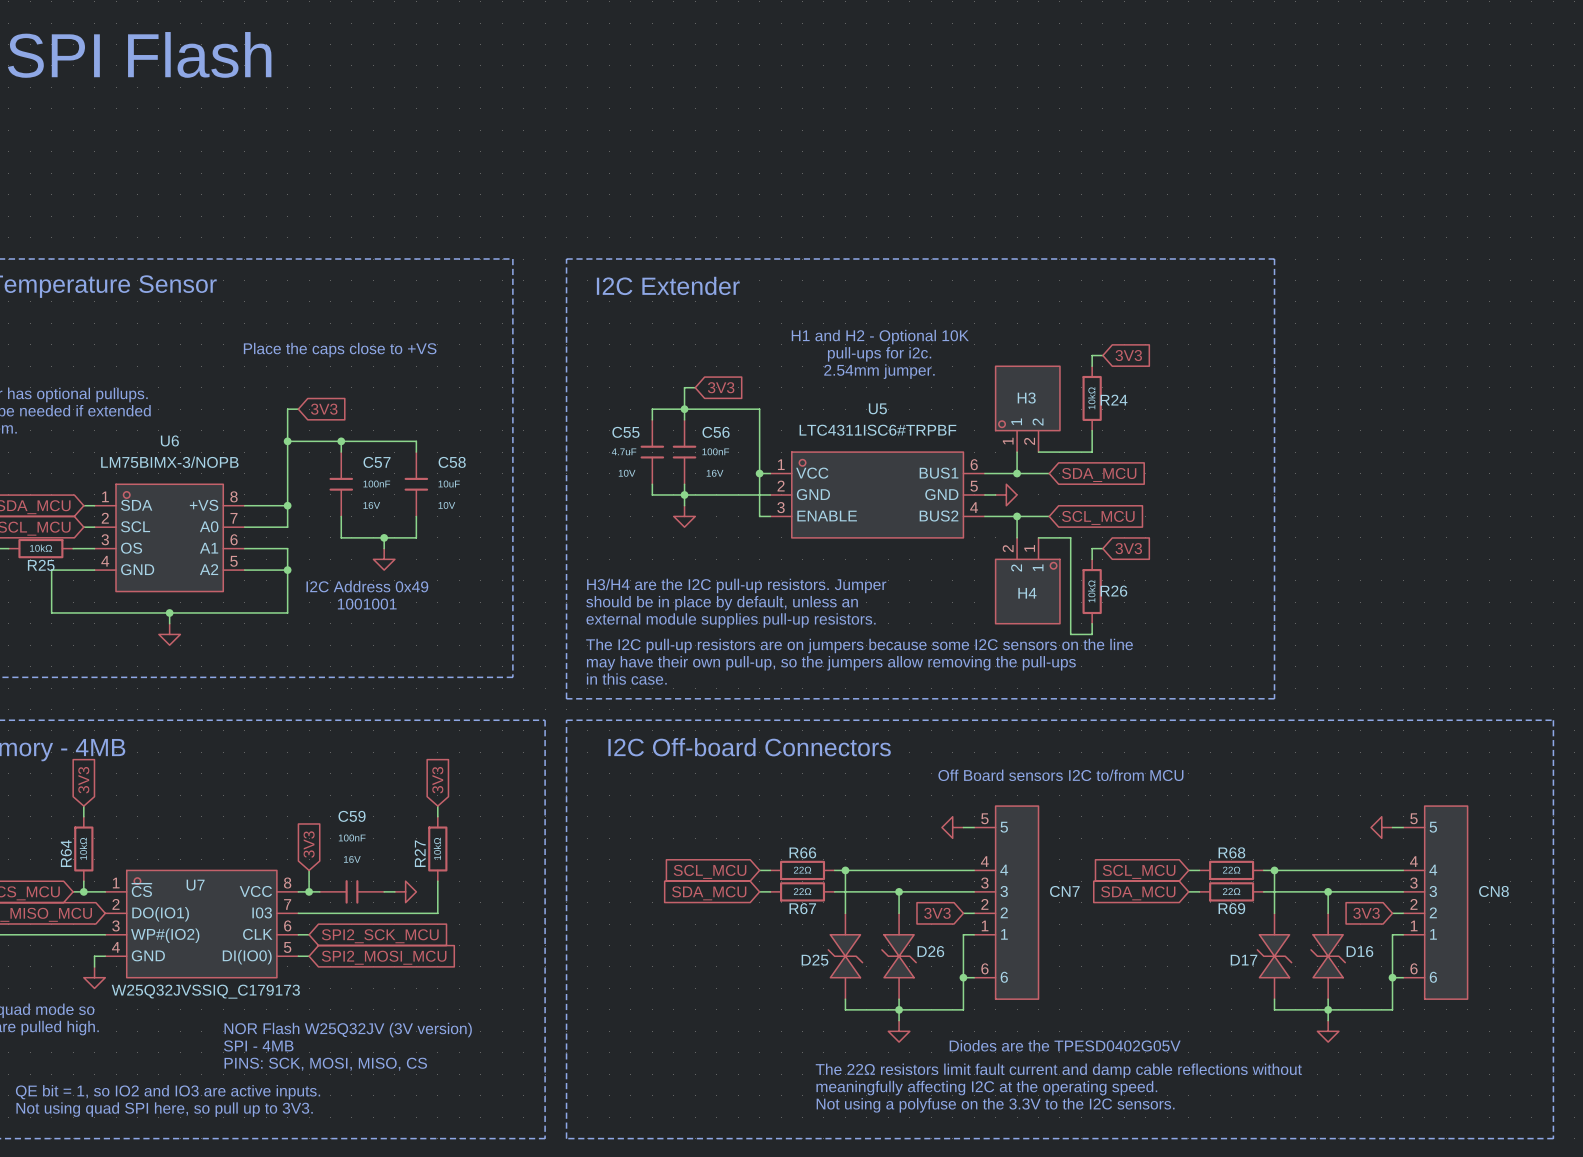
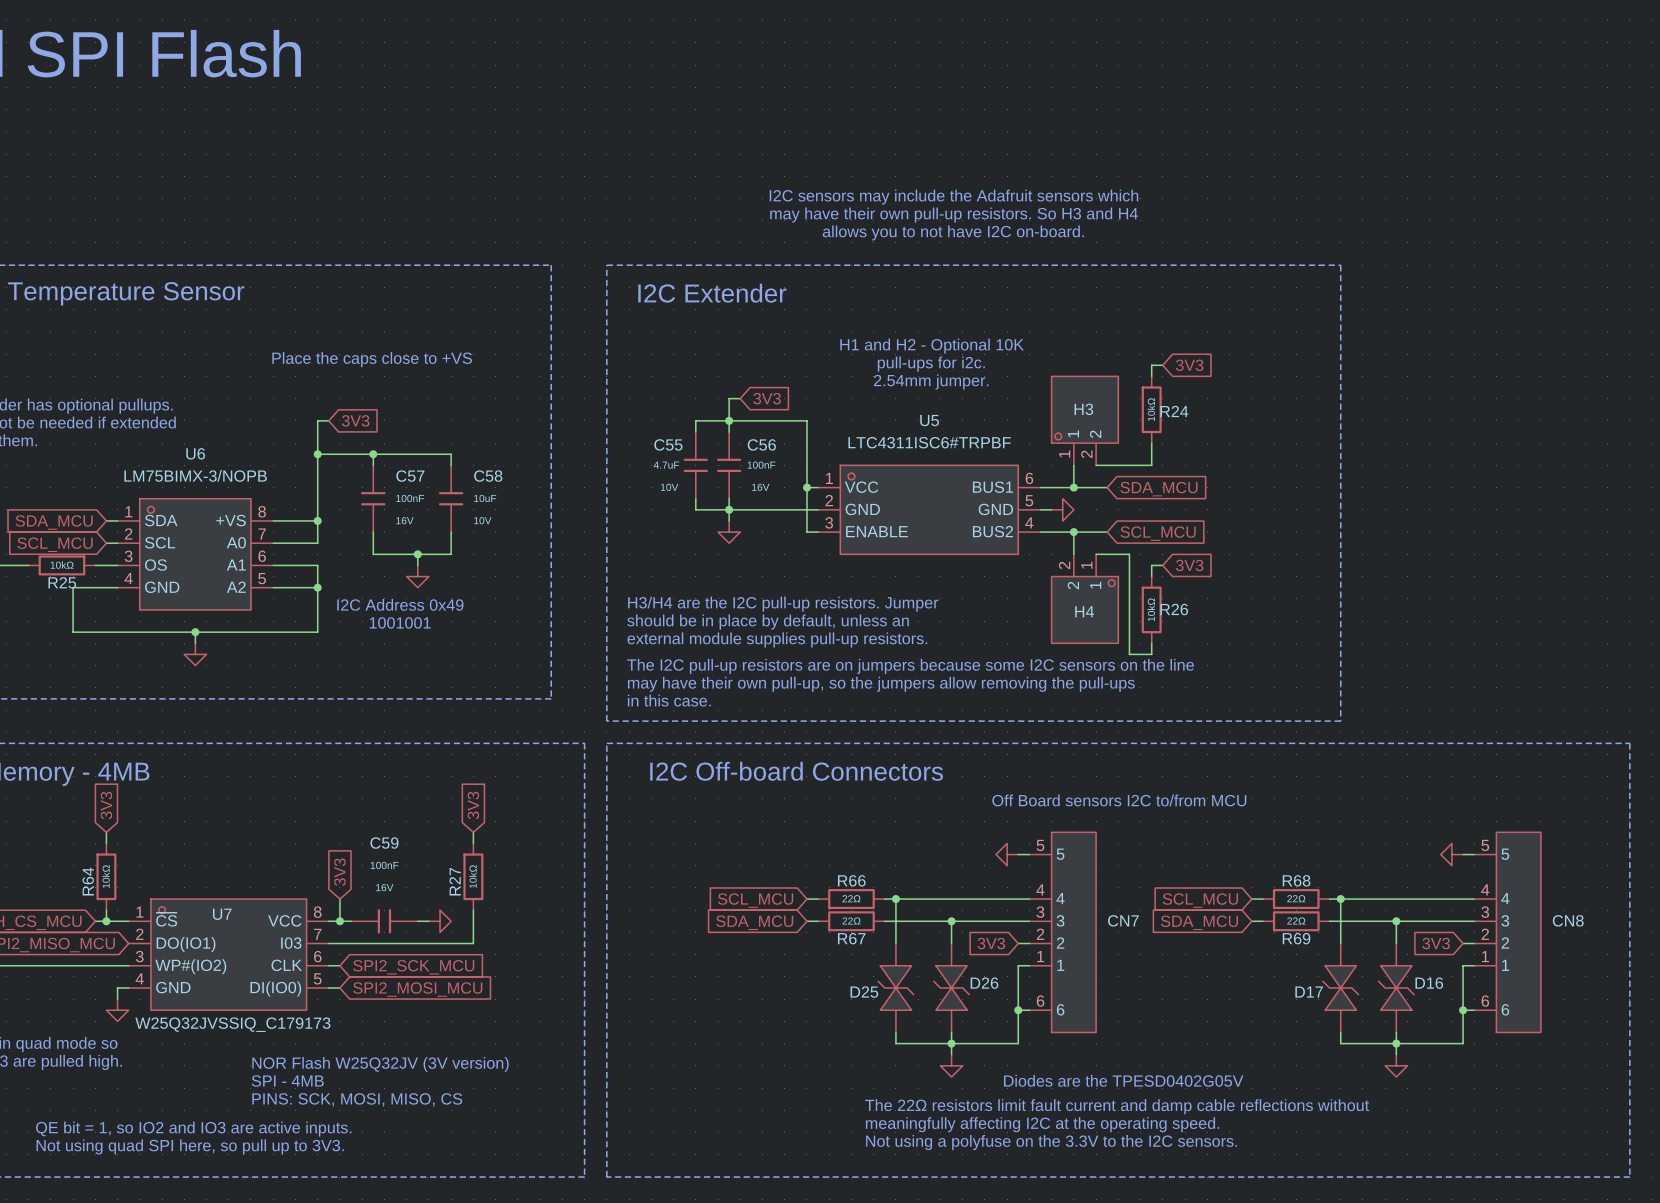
text: none -> I2C sensors may include the Adafruit sensors which (953, 197)
text: none -> may have their own pull-up resistors. So H3 and H4 (954, 215)
text: none -> allows you to not have I2C on-board. (953, 232)

